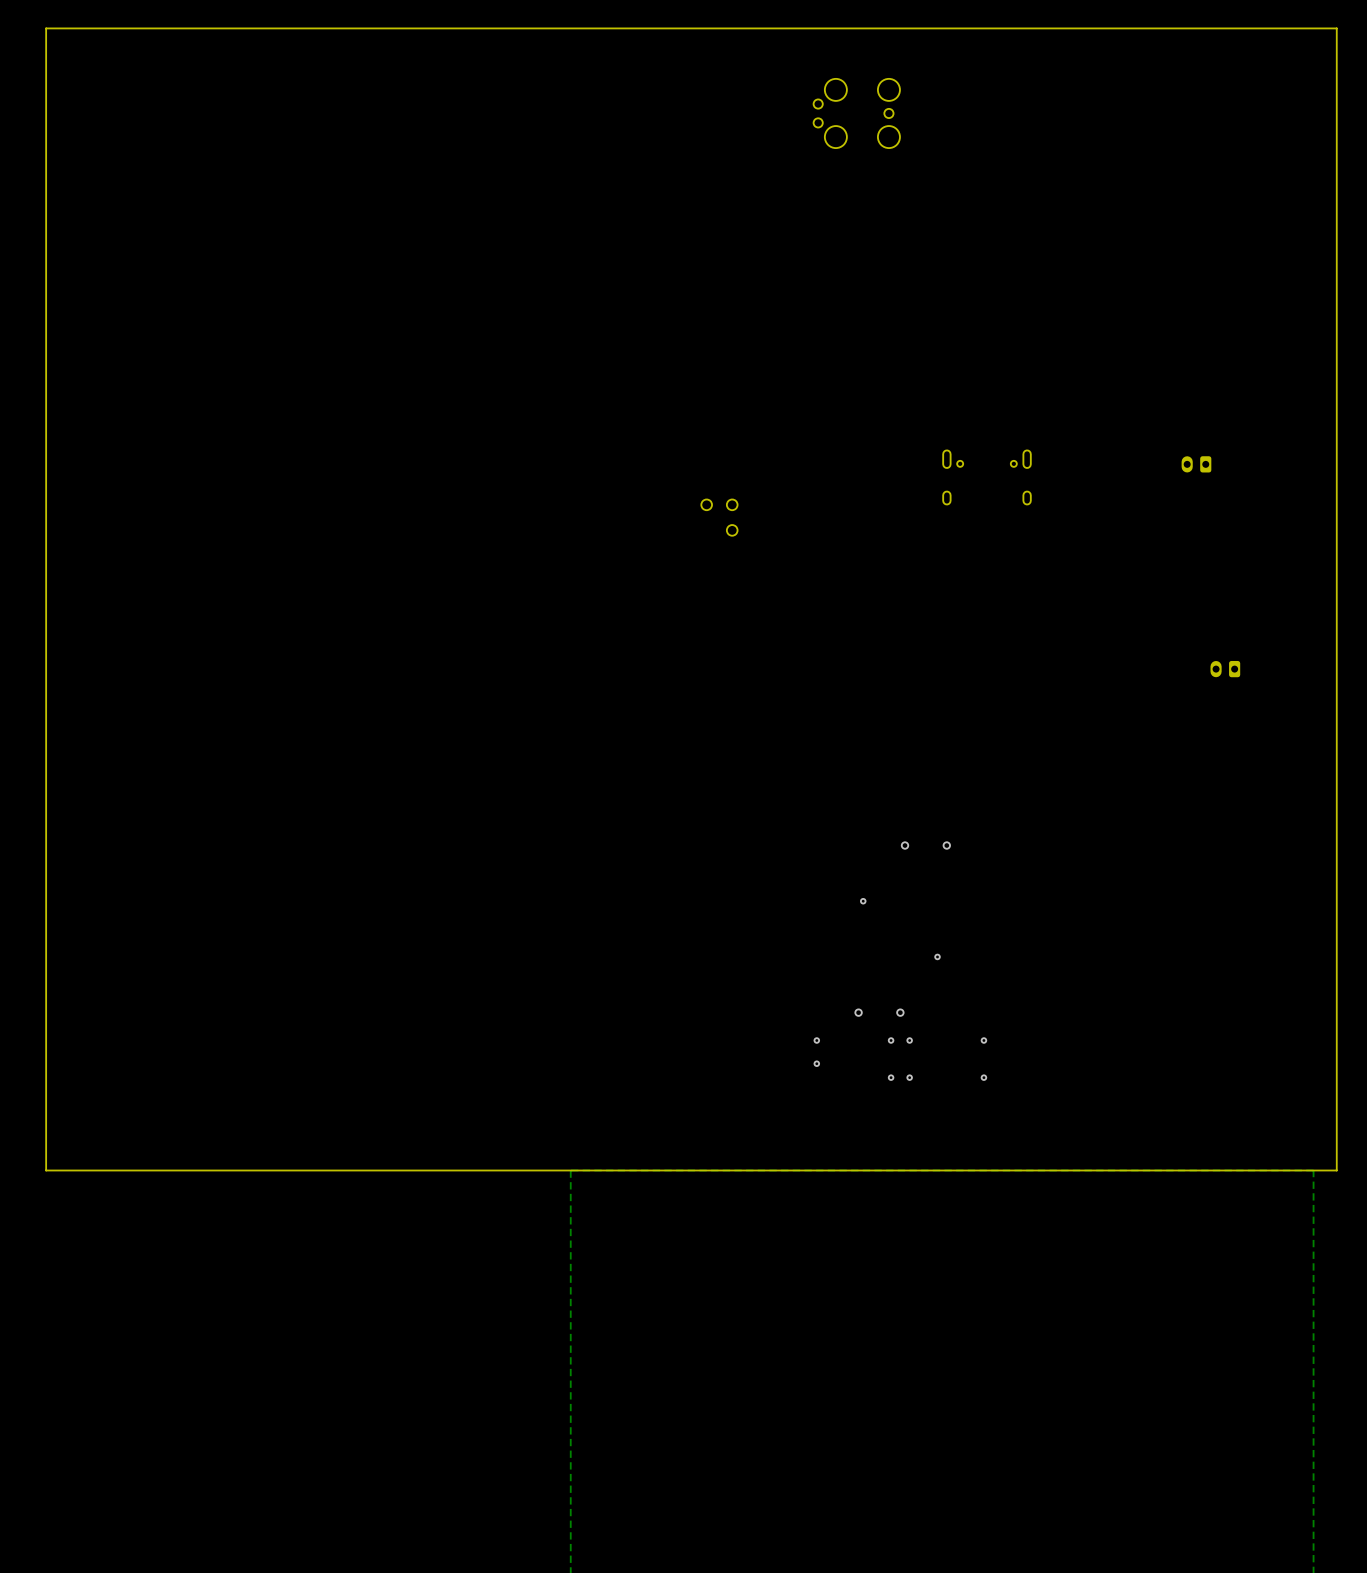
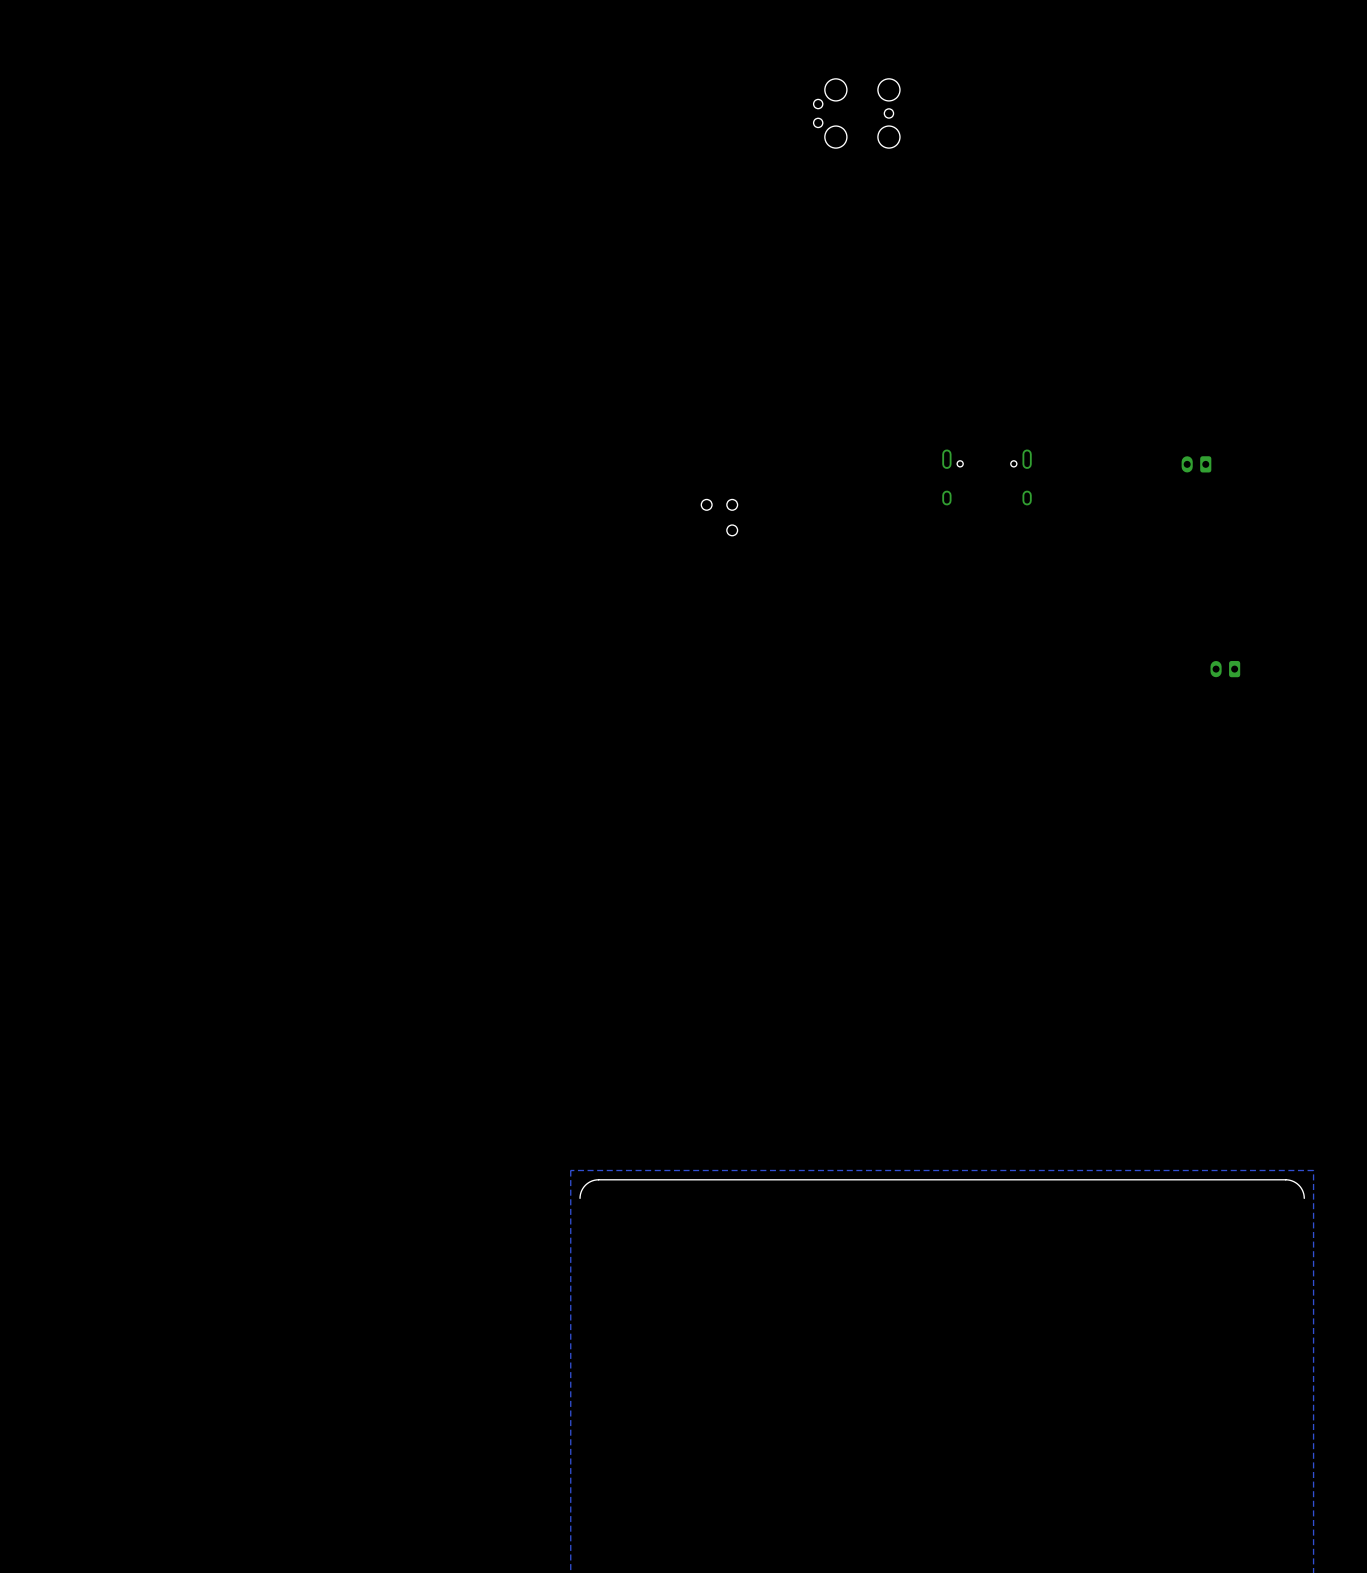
board edge: (1336, 28) (46, 28) (46, 1170) (1336, 1170) (1336, 28) -> none
via: (905, 845) -> none
via: (946, 845) -> none
via: (863, 901) -> none
via: (937, 956) -> none
via: (858, 1012) -> none
via: (900, 1012) -> none
via: (816, 1040) -> none
via: (891, 1040) -> none
via: (909, 1040) -> none
via: (983, 1040) -> none
via: (816, 1063) -> none
via: (891, 1077) -> none
via: (909, 1077) -> none
via: (983, 1077) -> none
board edge: none -> (1304, 1198) (1298, 1185) (1285, 1179) (598, 1179) (585, 1185) (580, 1198)

